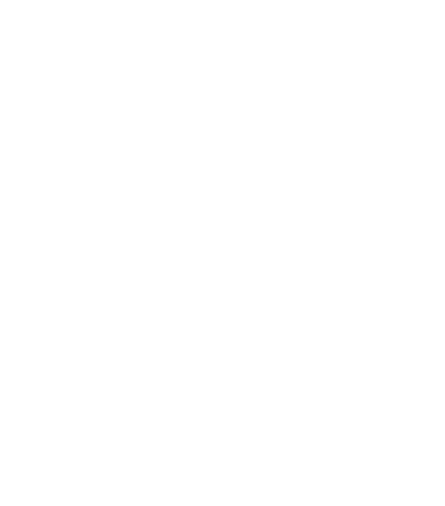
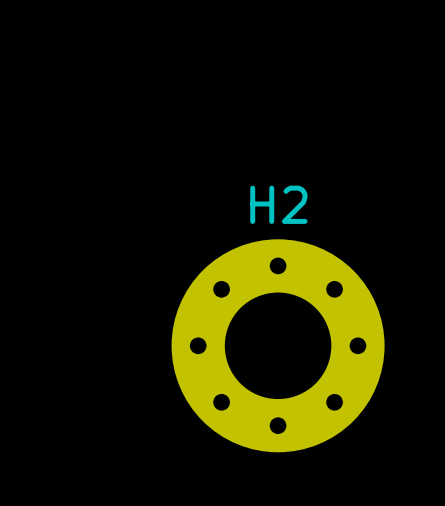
H2: none -> (278, 345)

